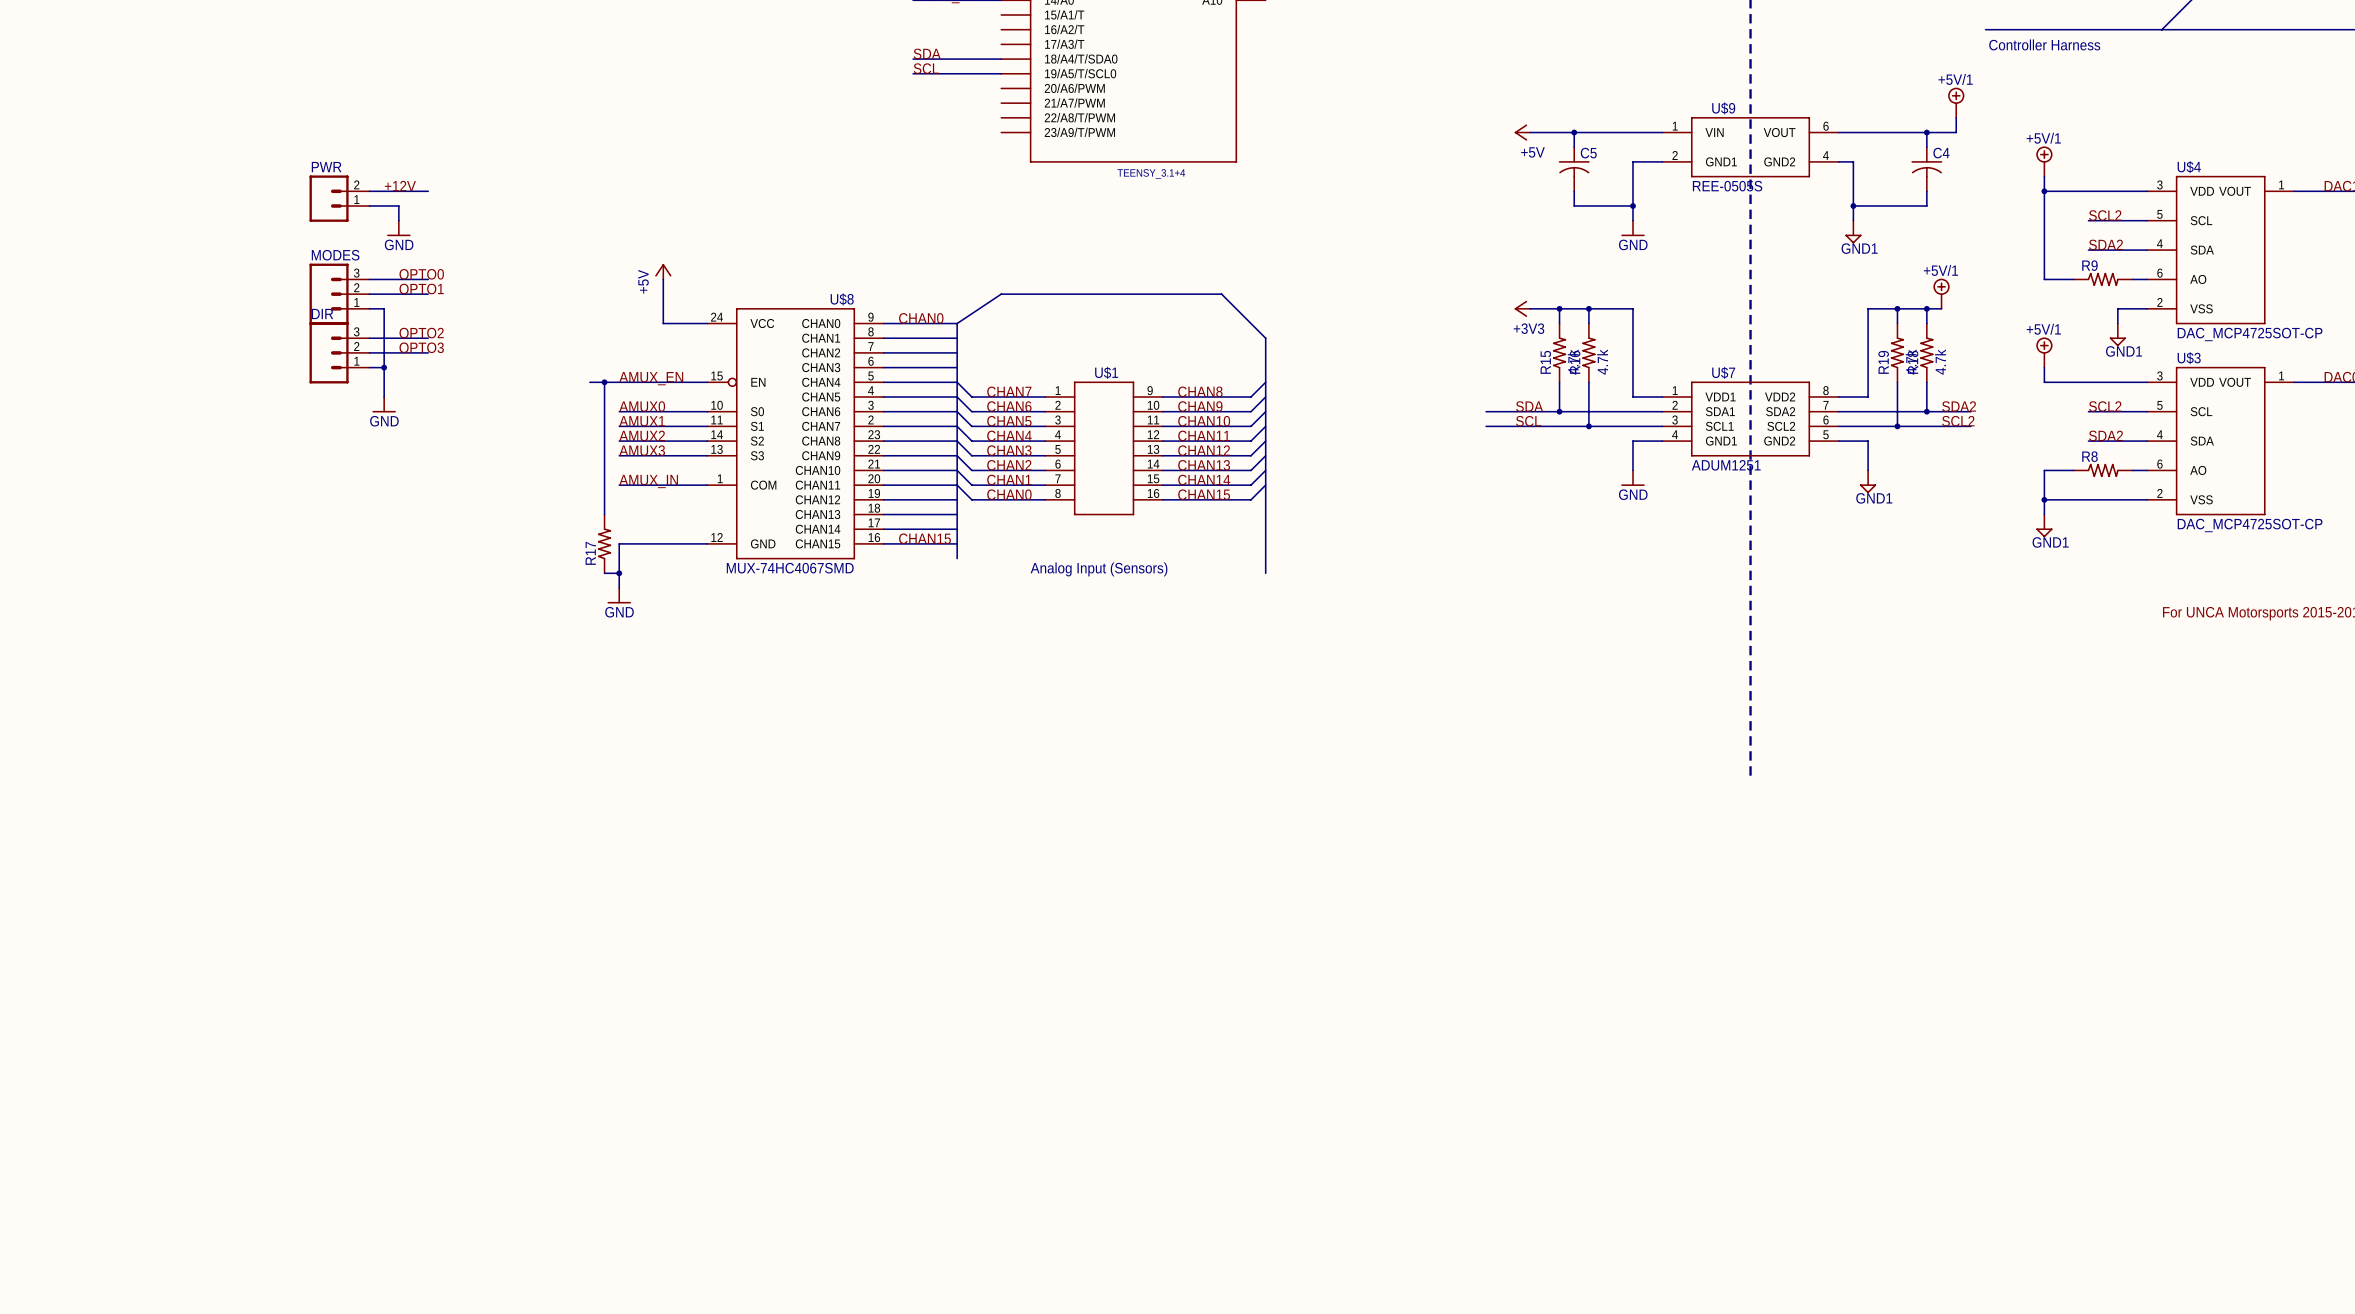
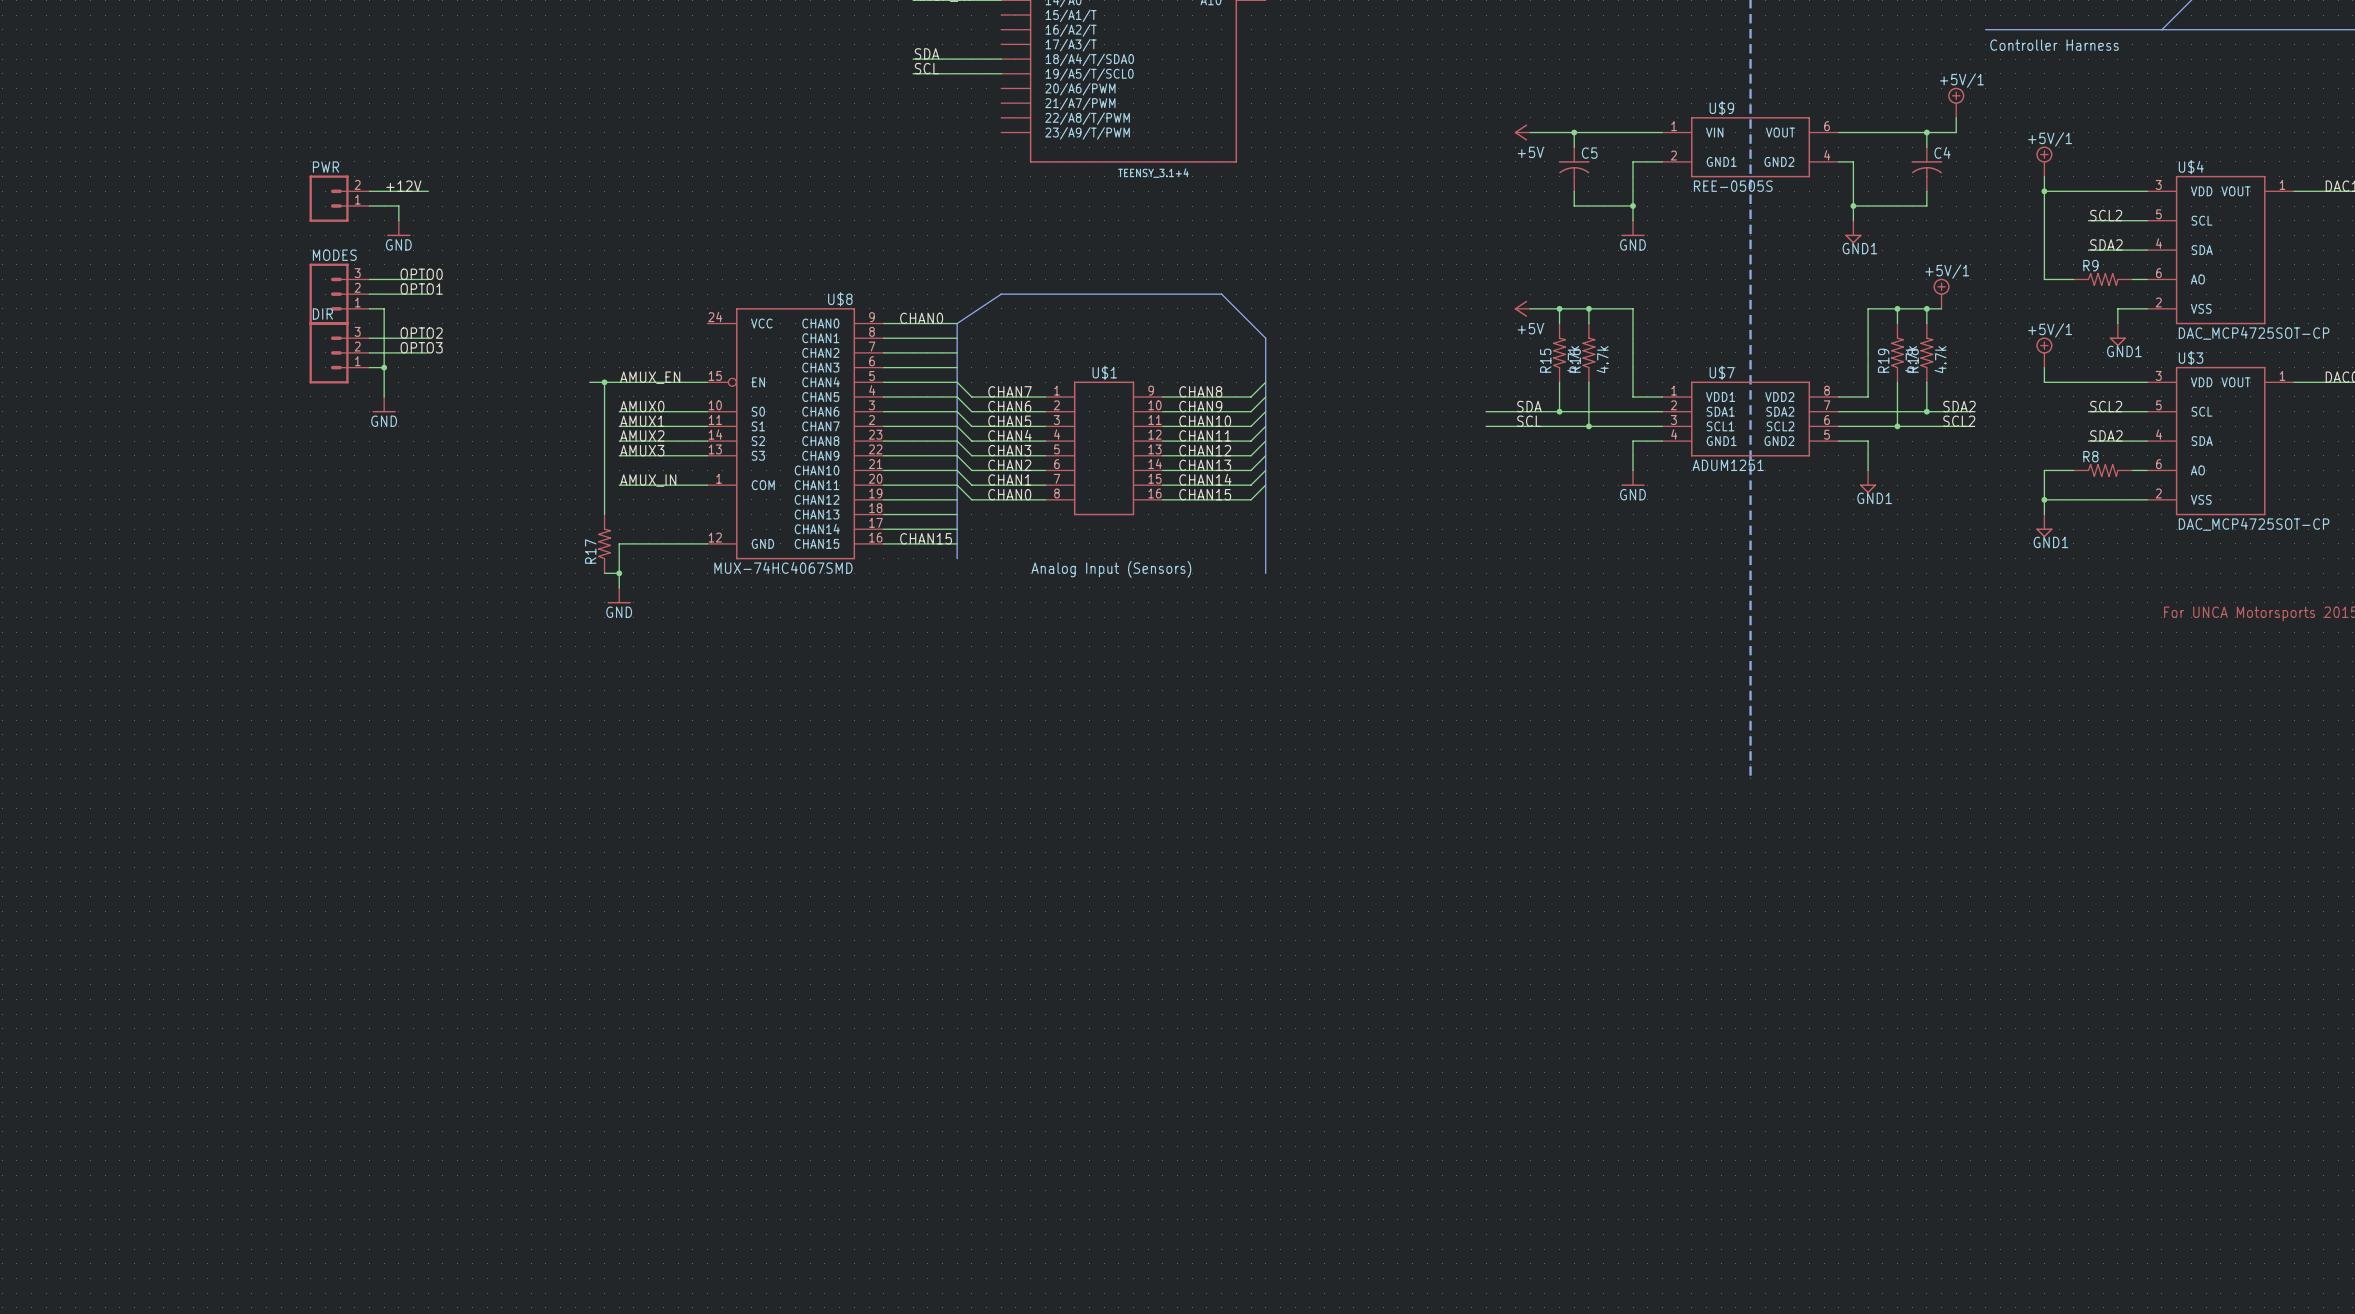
power symbol: +5V (663, 271) -> none
wire: (663, 279) (663, 323) (707, 323) -> none
power symbol: +3V3 (1522, 308) -> +5V (1522, 308)

